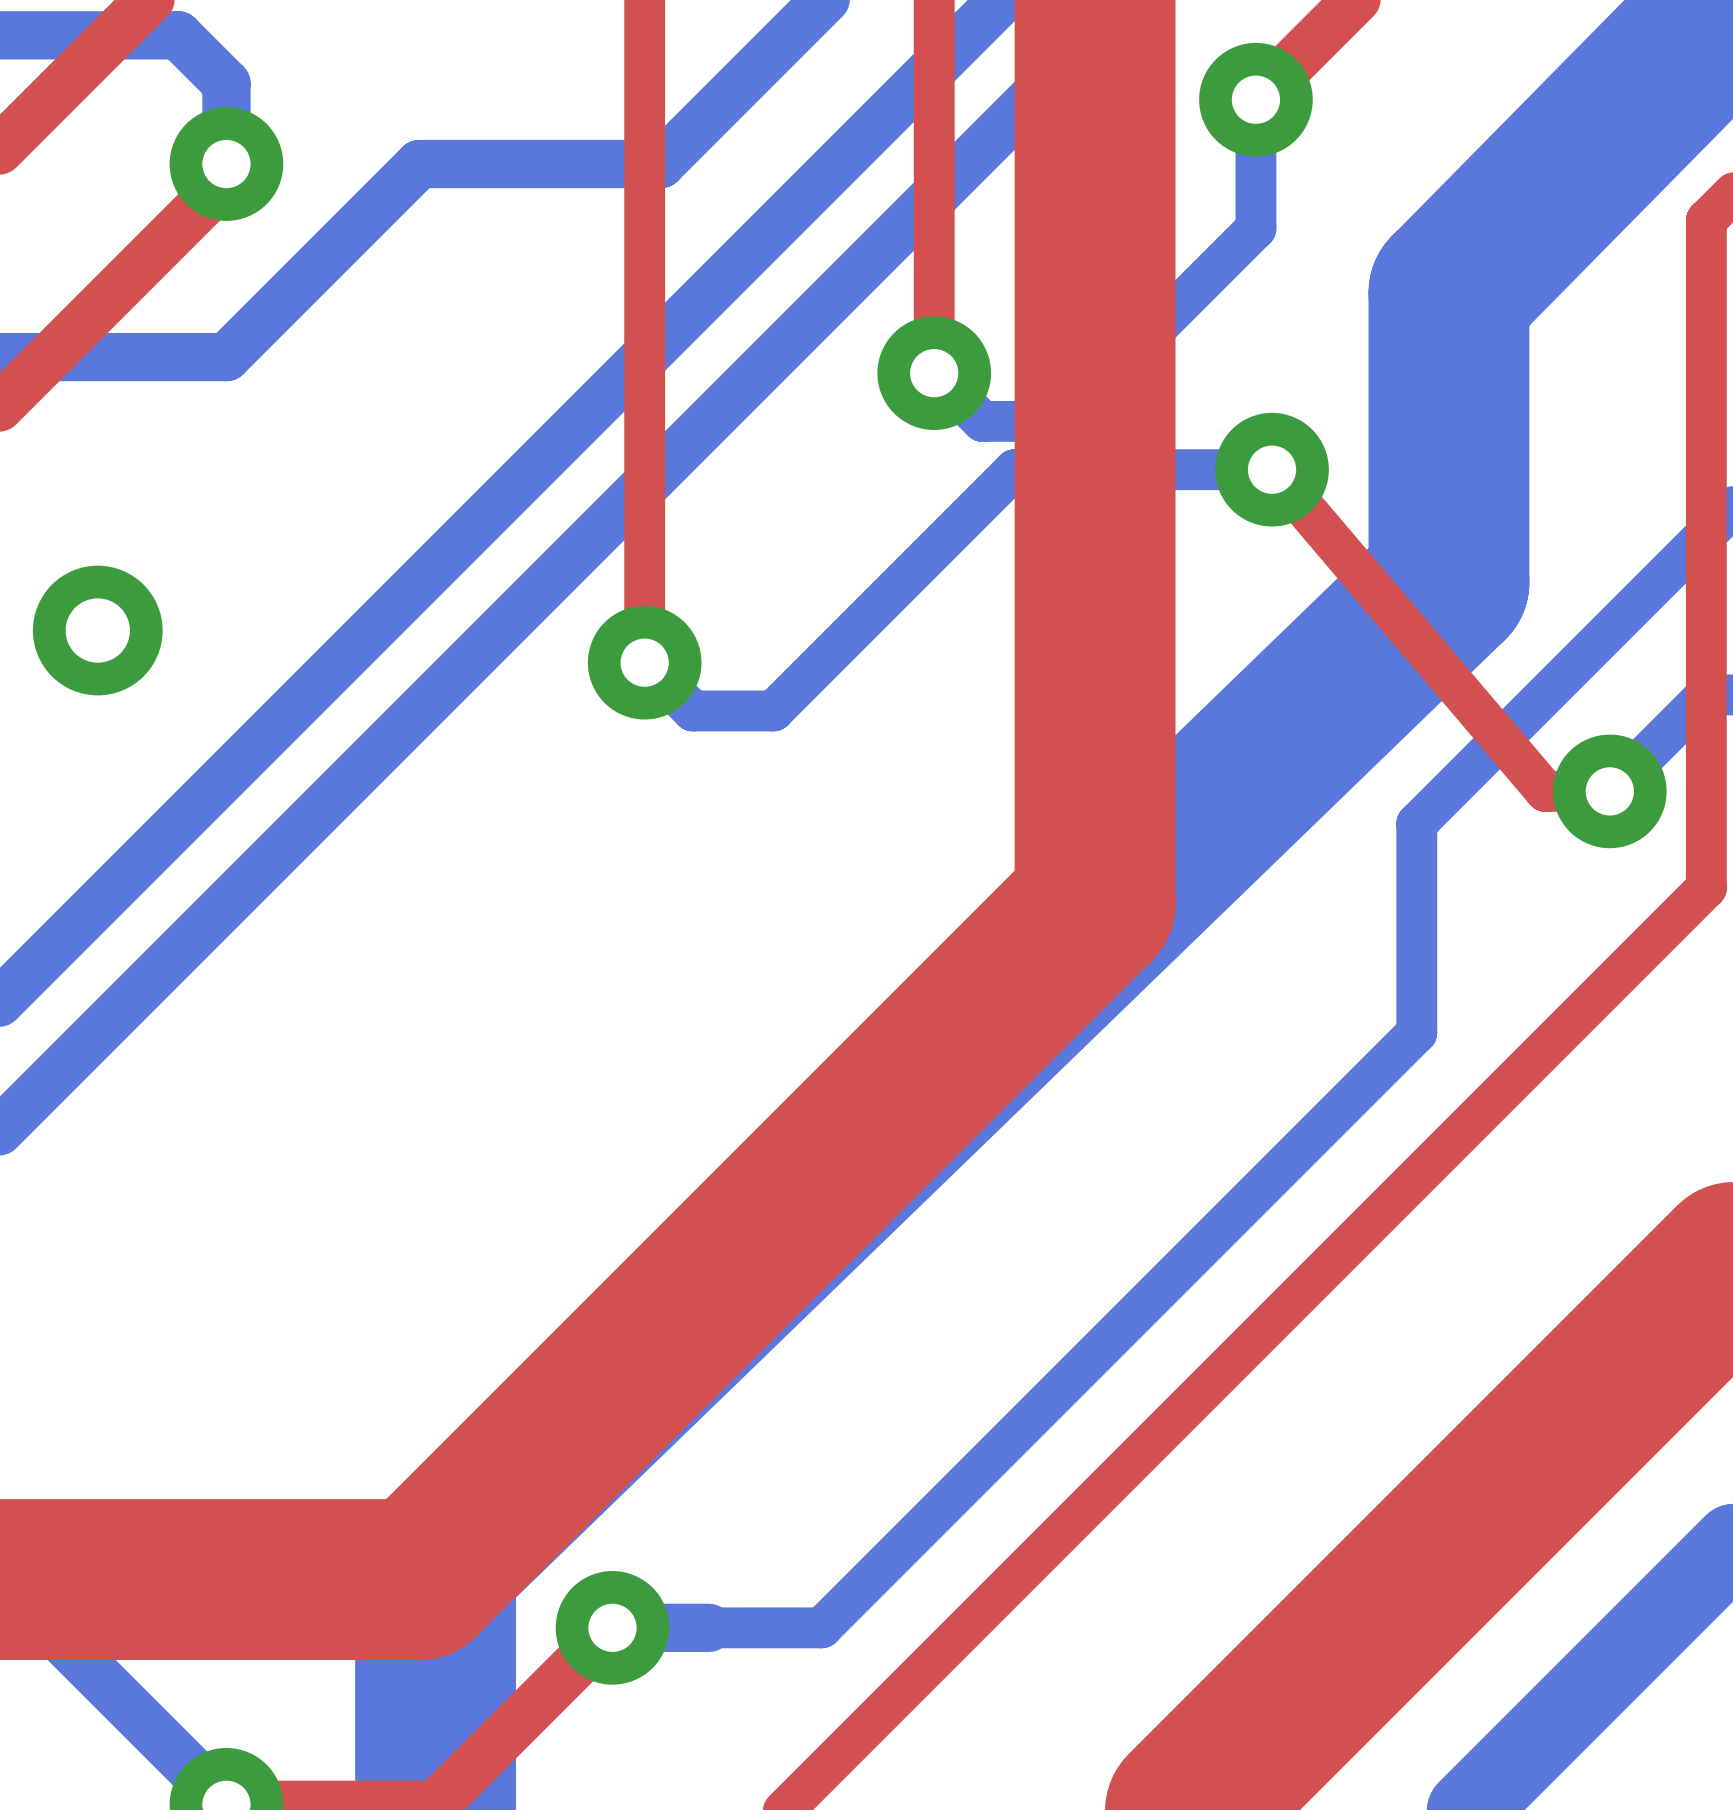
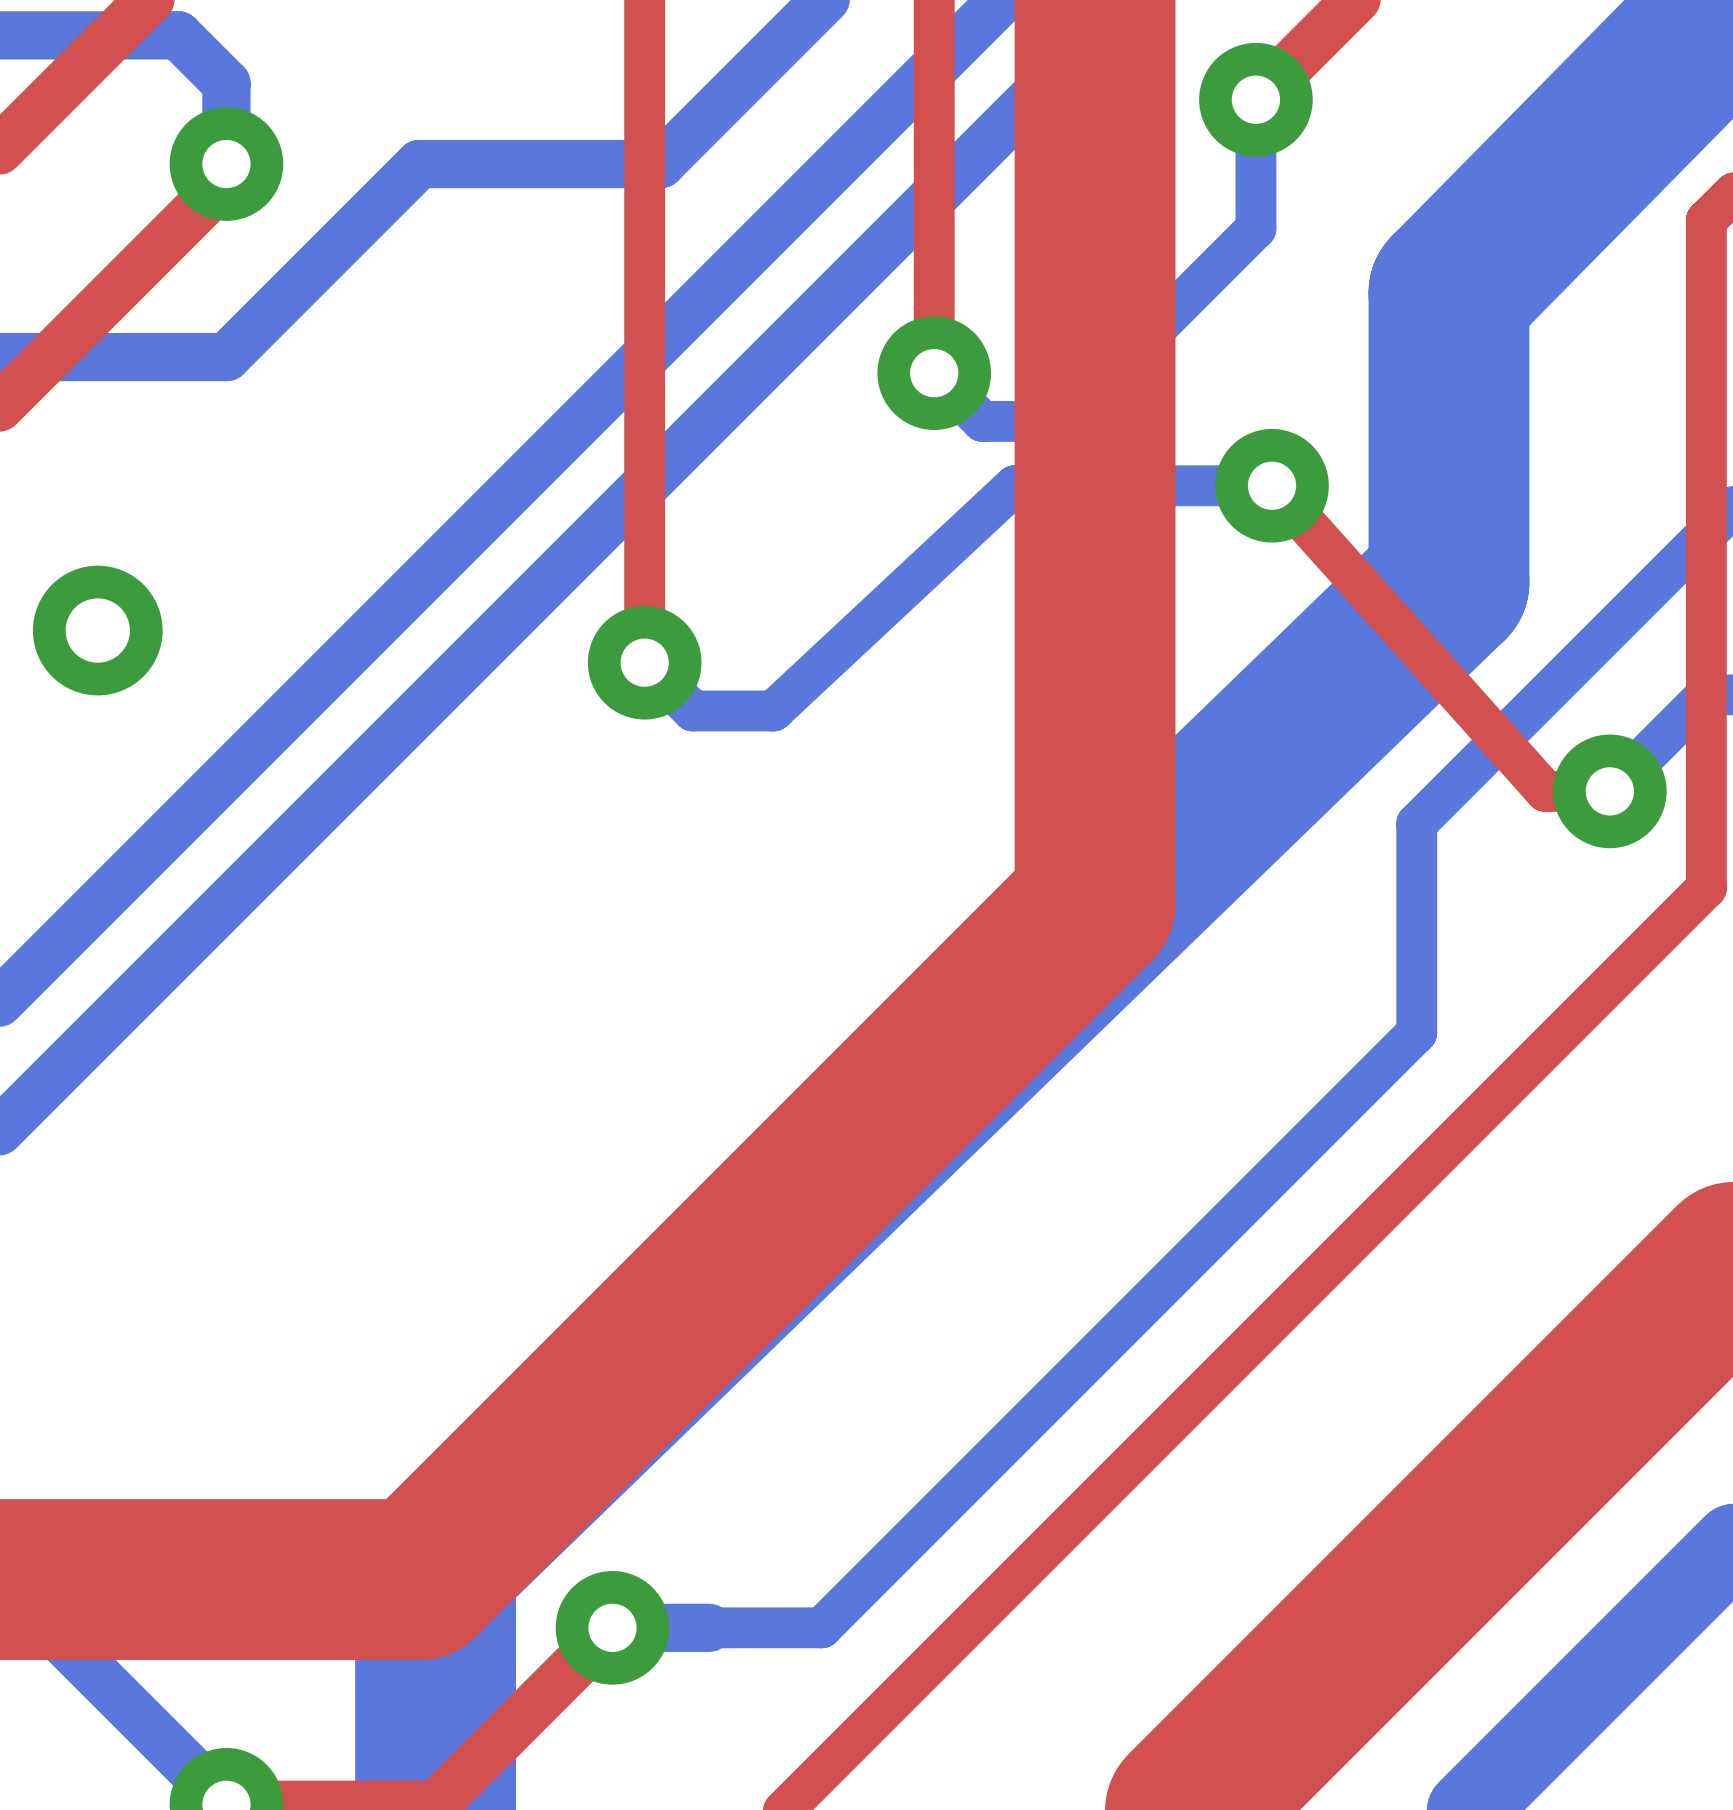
bottom track: (1272, 469) (1014, 469) (773, 710) -> (1272, 485) (1014, 485) (773, 710)
top track: (1272, 469) (1545, 791) -> (1272, 485) (1545, 791)
via position: (1272, 469) -> (1272, 485)

